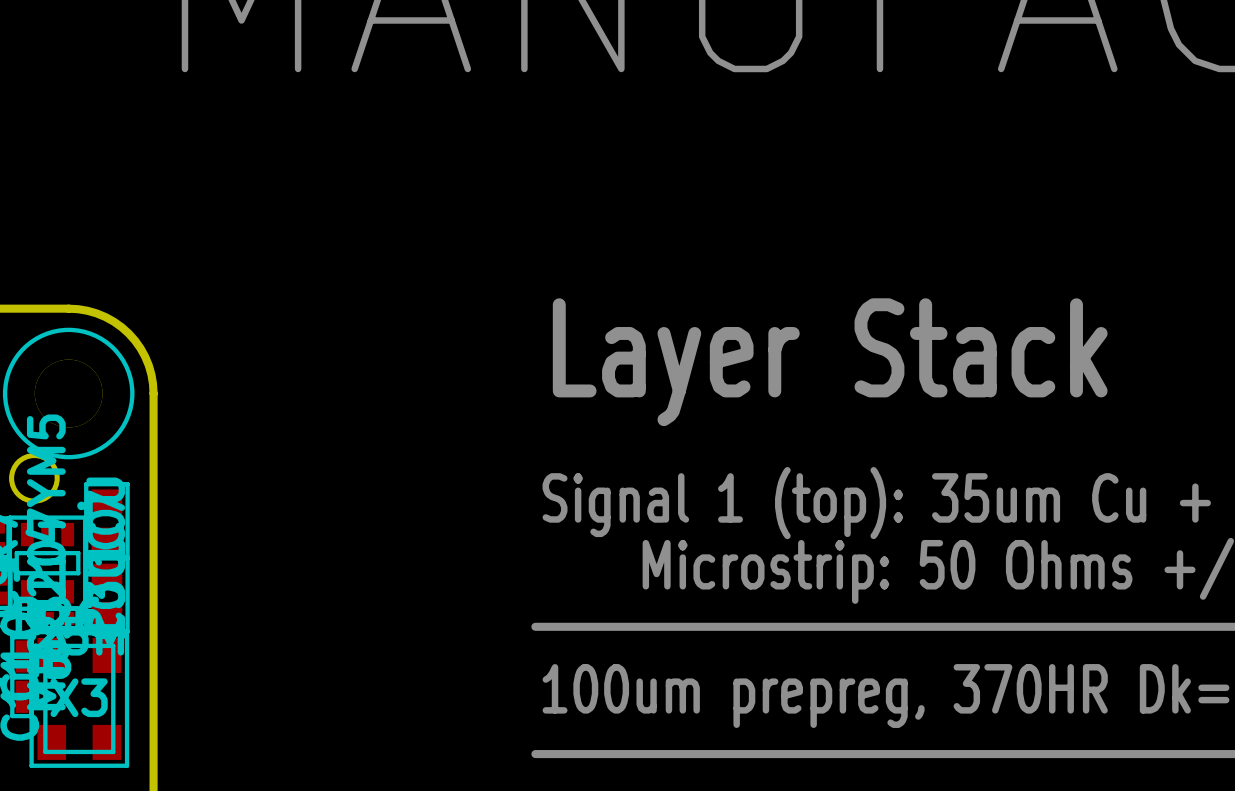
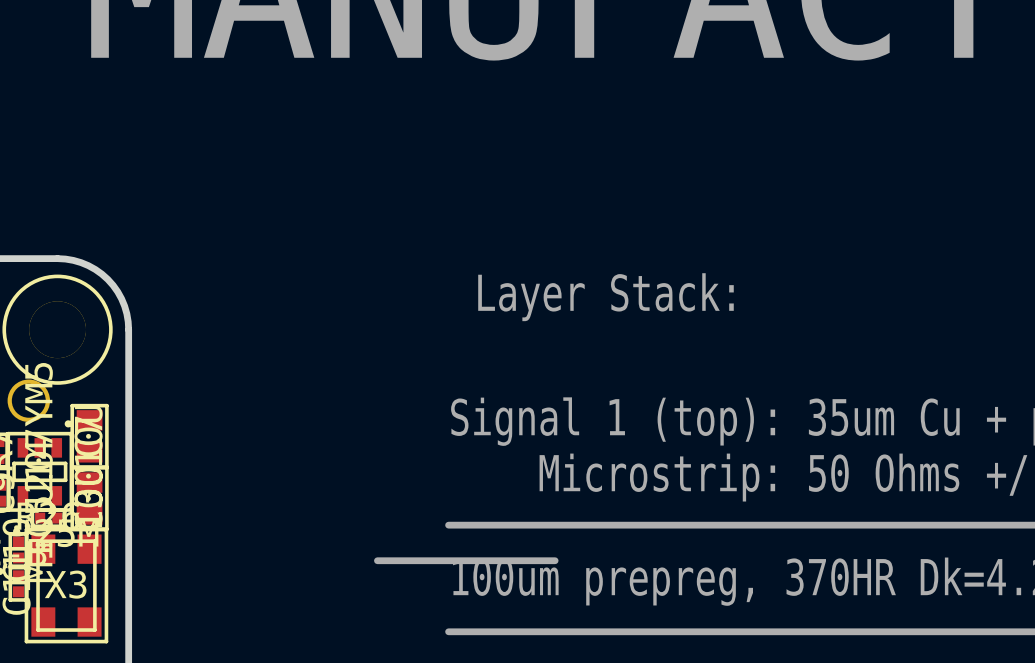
text: Layer Stack (830, 362) -> Layer Stack: (605, 297)
line: none -> (377, 560) (555, 560)

